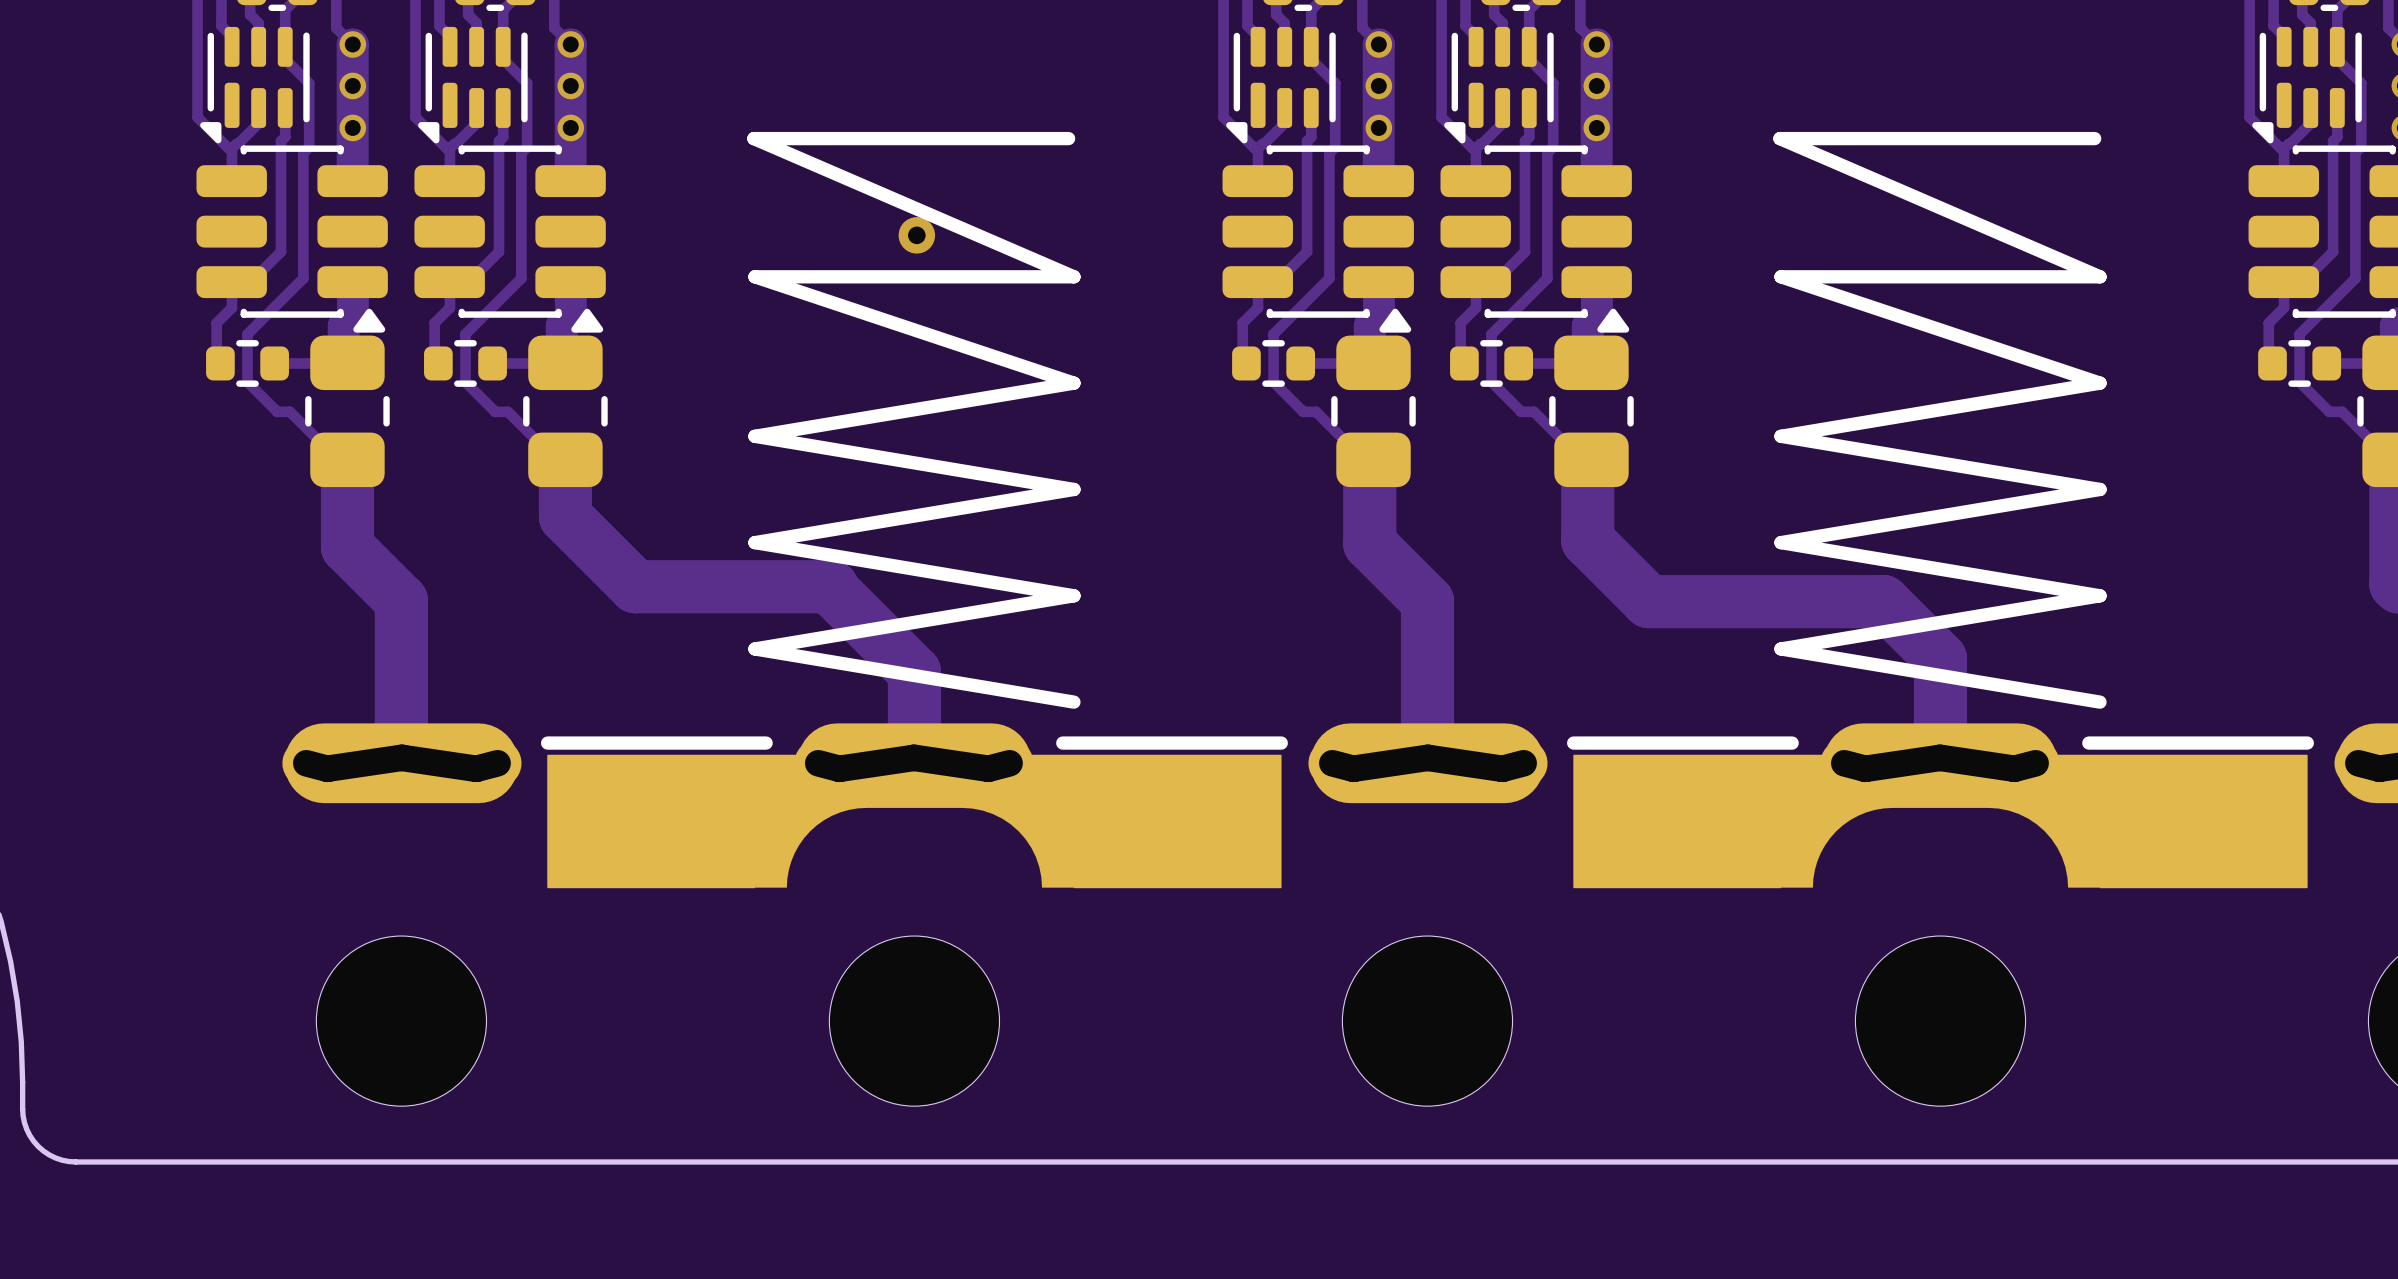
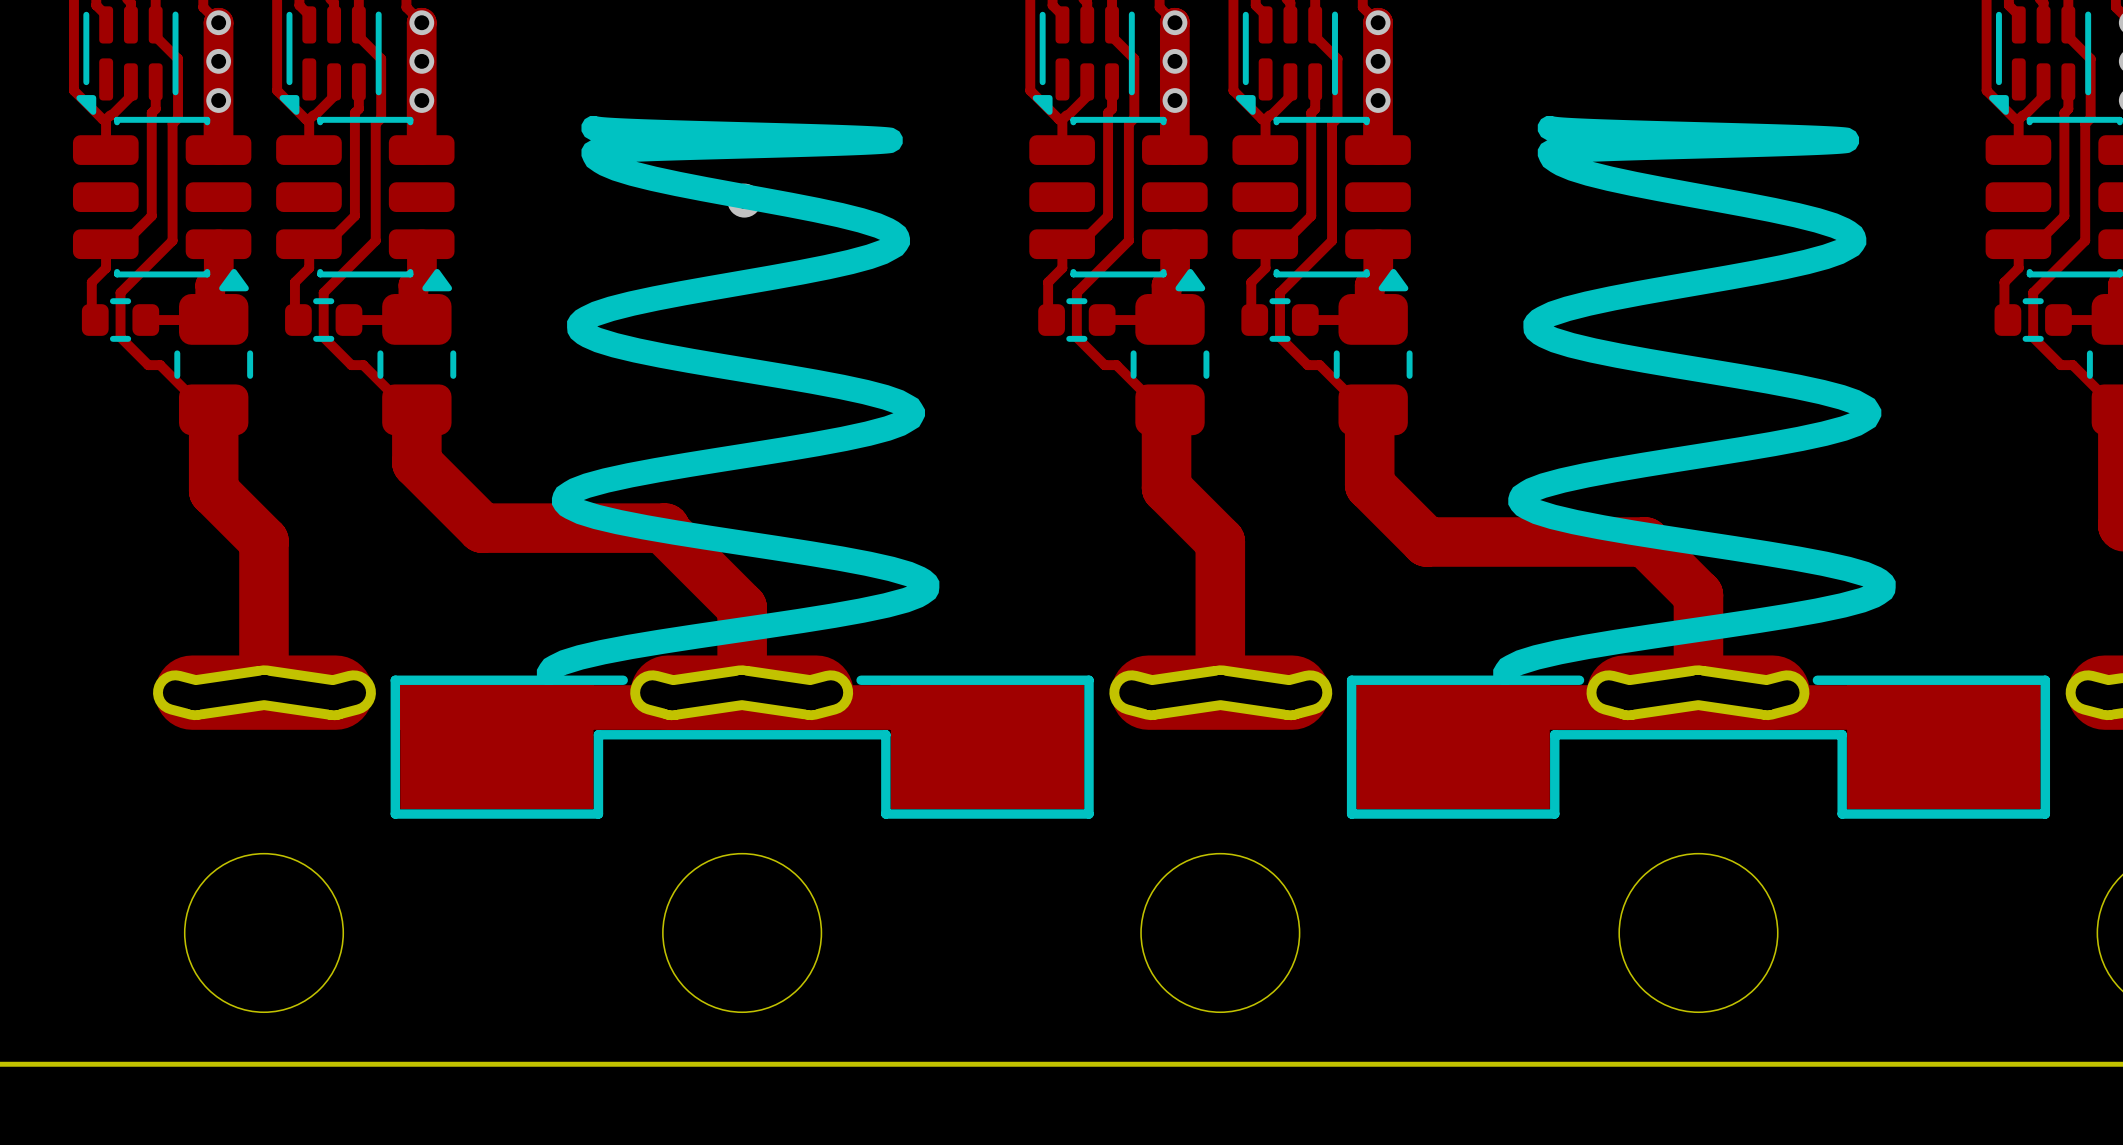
part footprint: [540, 131, 1288, 889] -> [390, 116, 1094, 819]
part footprint: [1567, 131, 2314, 889] -> [1346, 116, 2051, 819]

